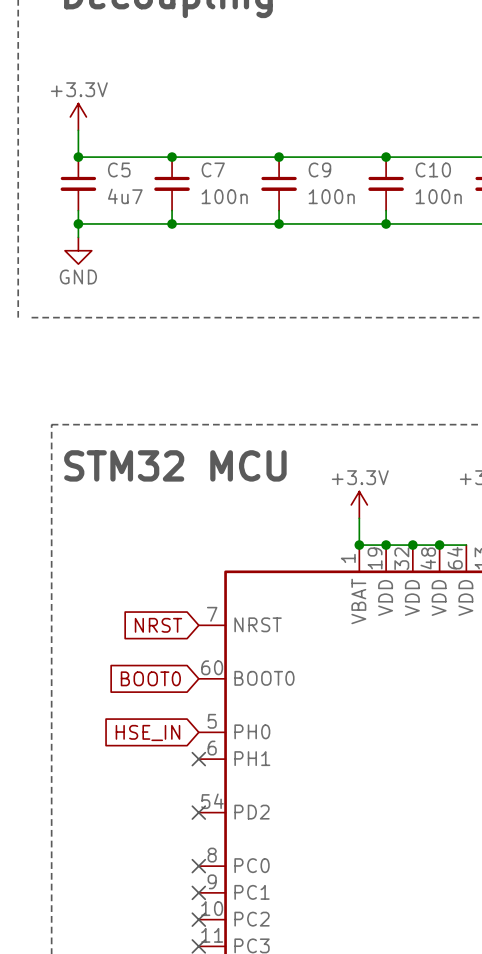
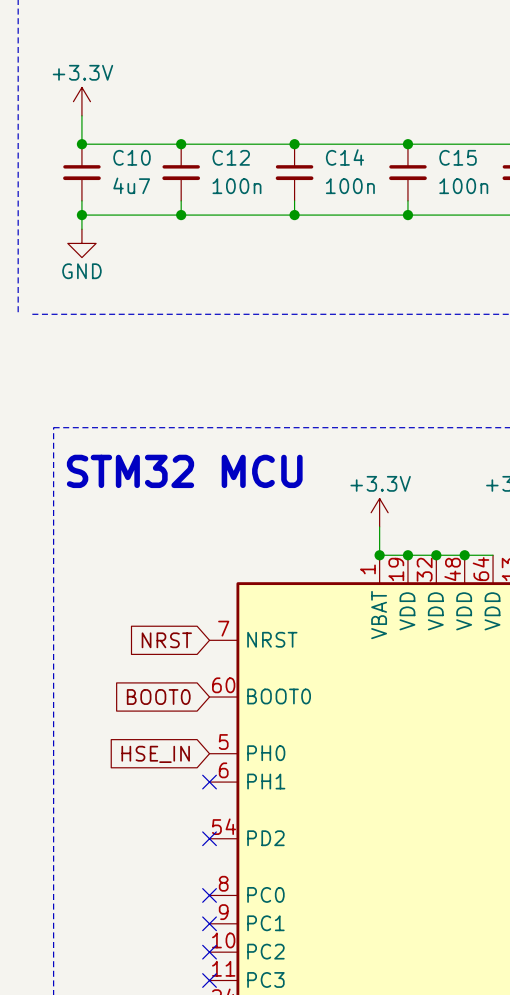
C5 name: C5 (119, 169) -> C10 (132, 157)
C7 name: C7 (213, 169) -> C12 (231, 157)
C9 name: C9 (319, 169) -> C14 (344, 157)
C10 name: C10 (433, 169) -> C15 (458, 157)

